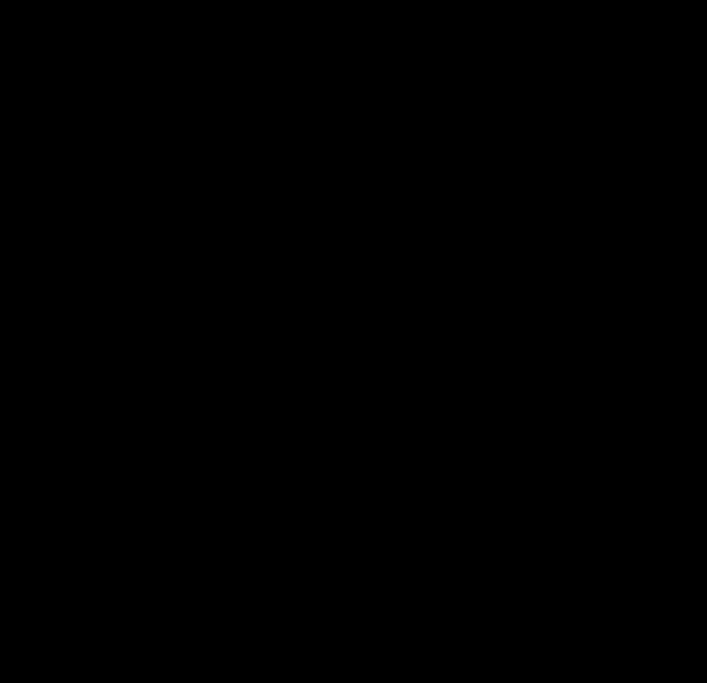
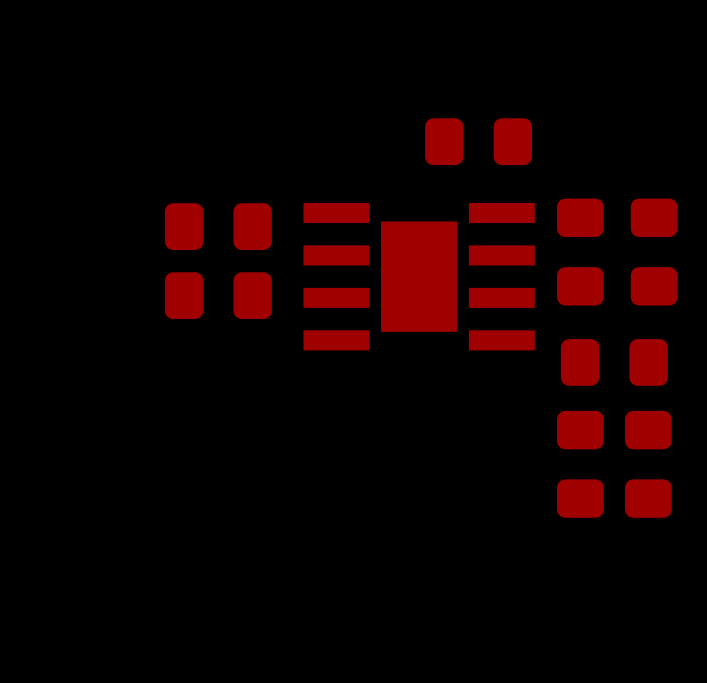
part: none -> (478, 141)
part: none -> (218, 226)
part: none -> (580, 252)
part: none -> (654, 252)
part: none -> (419, 276)
part: none -> (218, 295)
part: none -> (614, 362)
part: none -> (580, 464)
part: none -> (648, 464)

